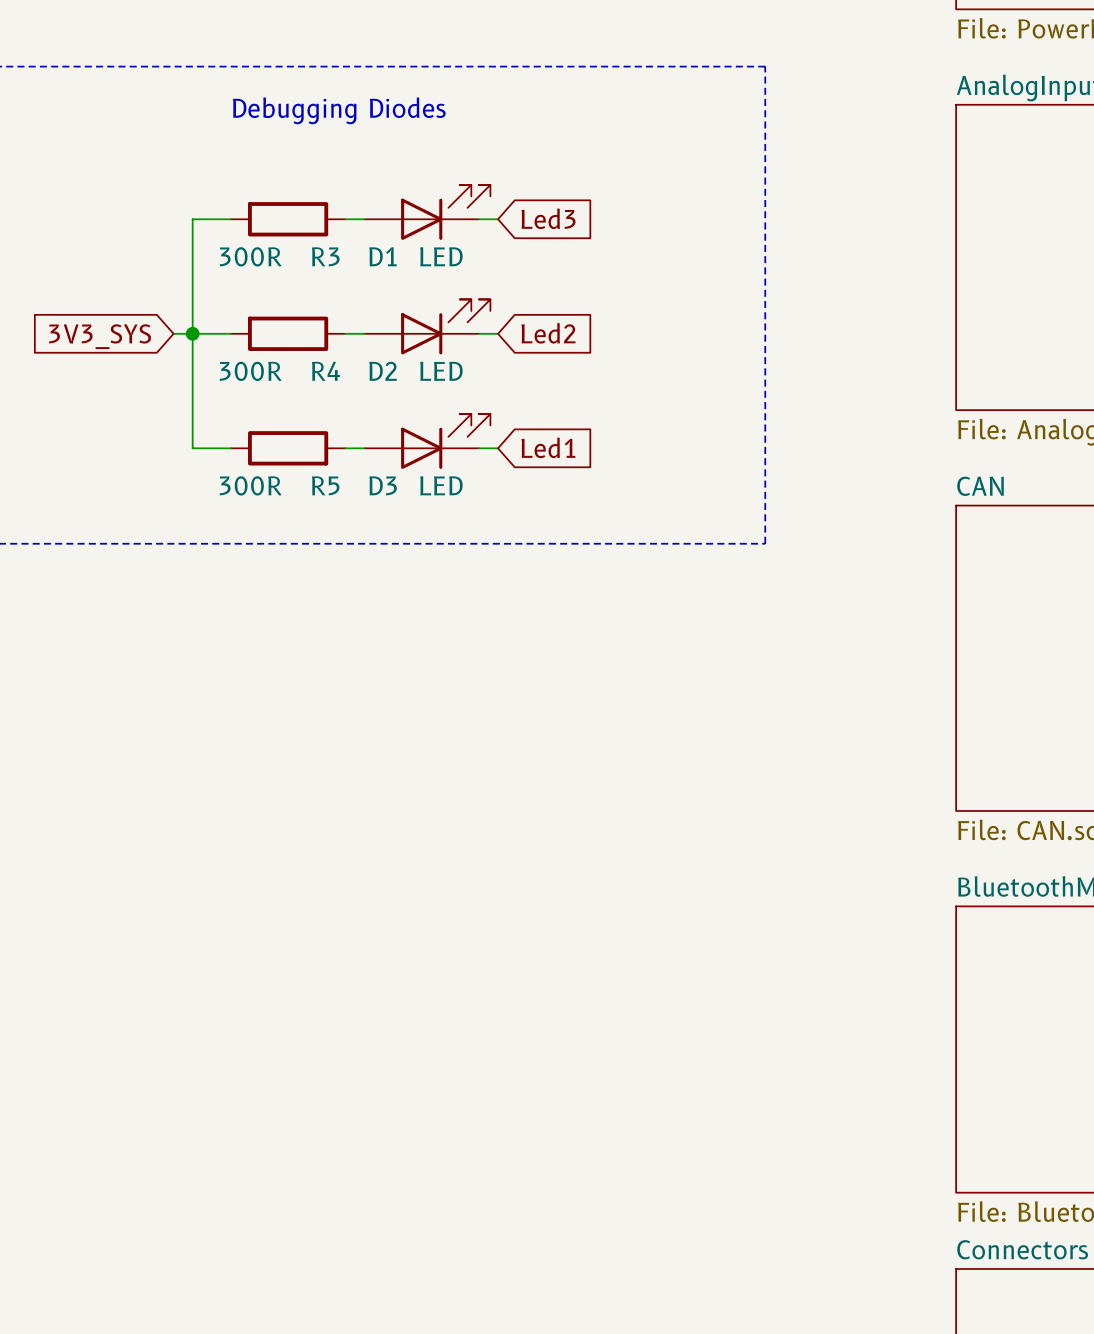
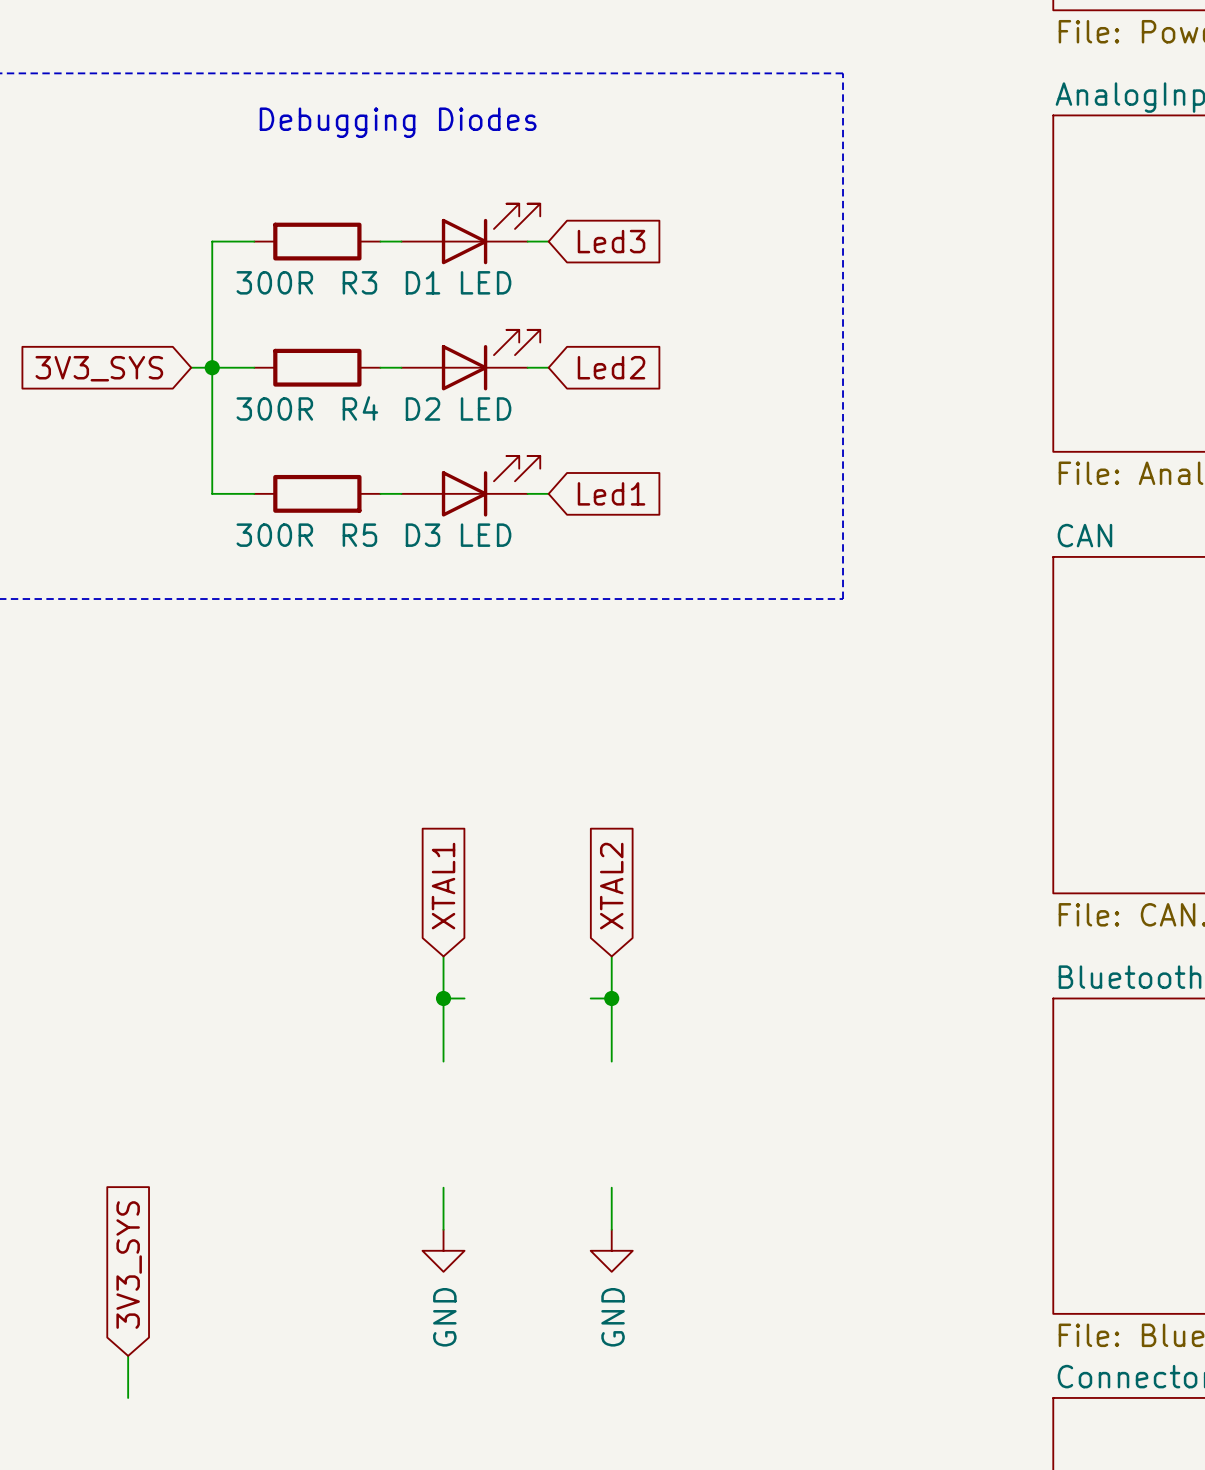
global label: none -> XTAL1 (443, 886)
global label: none -> XTAL2 (611, 886)
wire: none -> (443, 956) (443, 1061)
wire: none -> (611, 956) (611, 1061)
wire: none -> (443, 998) (464, 998)
junction: none -> (443, 998)
wire: none -> (590, 998) (611, 998)
junction: none -> (611, 998)
wire: none -> (443, 1187) (443, 1229)
wire: none -> (611, 1187) (611, 1229)
power symbol: none -> GND (443, 1250)
power symbol: none -> GND (611, 1250)
global label: none -> 3V3_SYS (129, 1265)
wire: none -> (128, 1355) (128, 1397)

